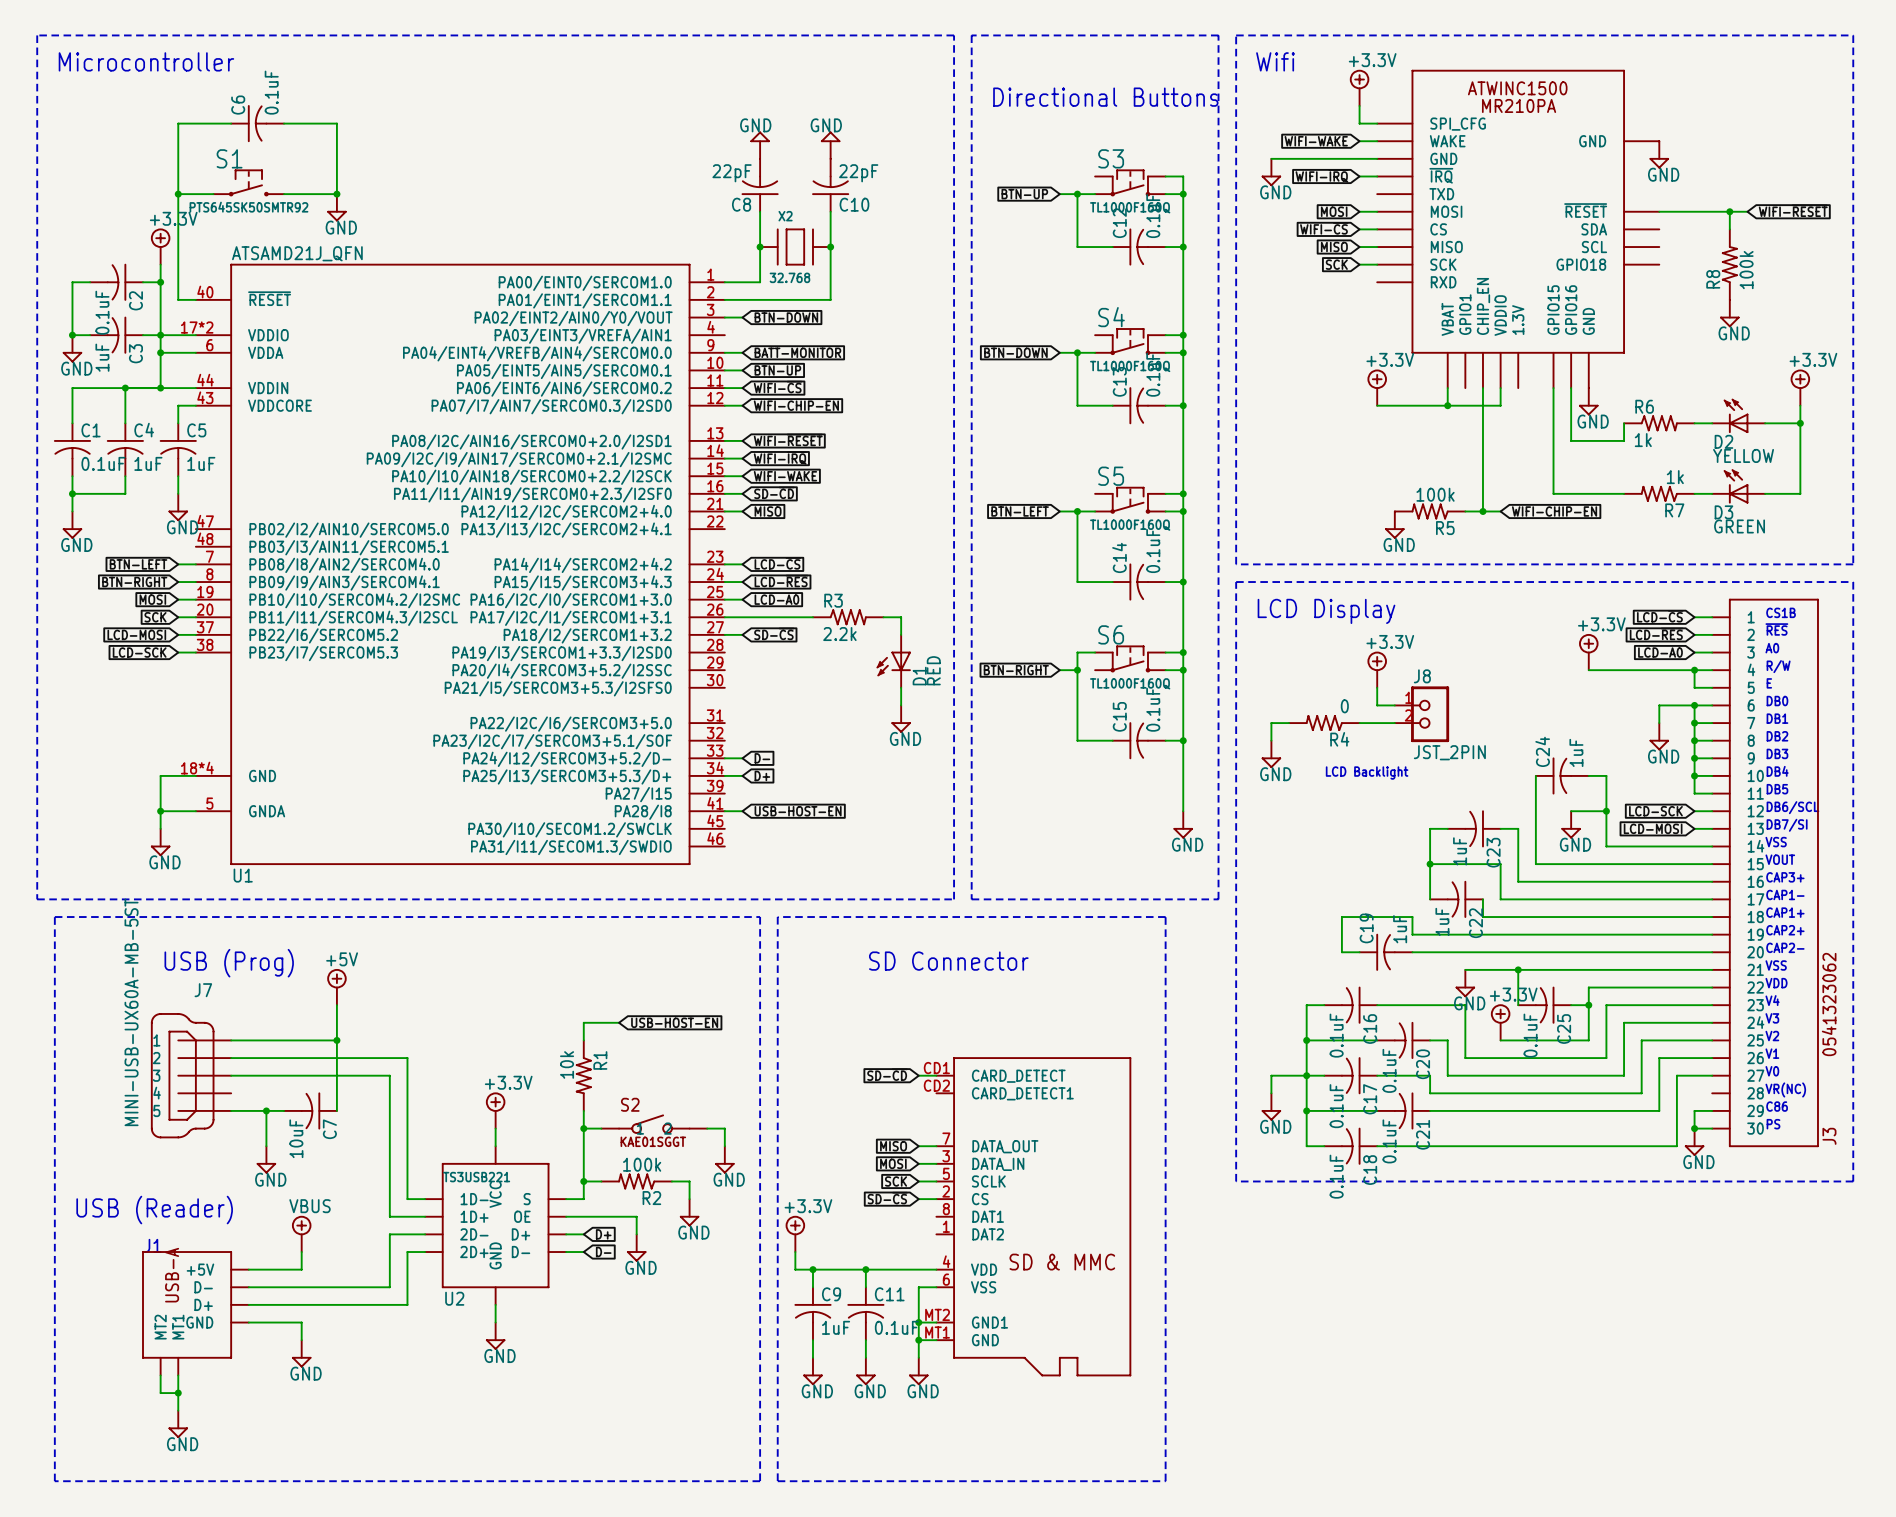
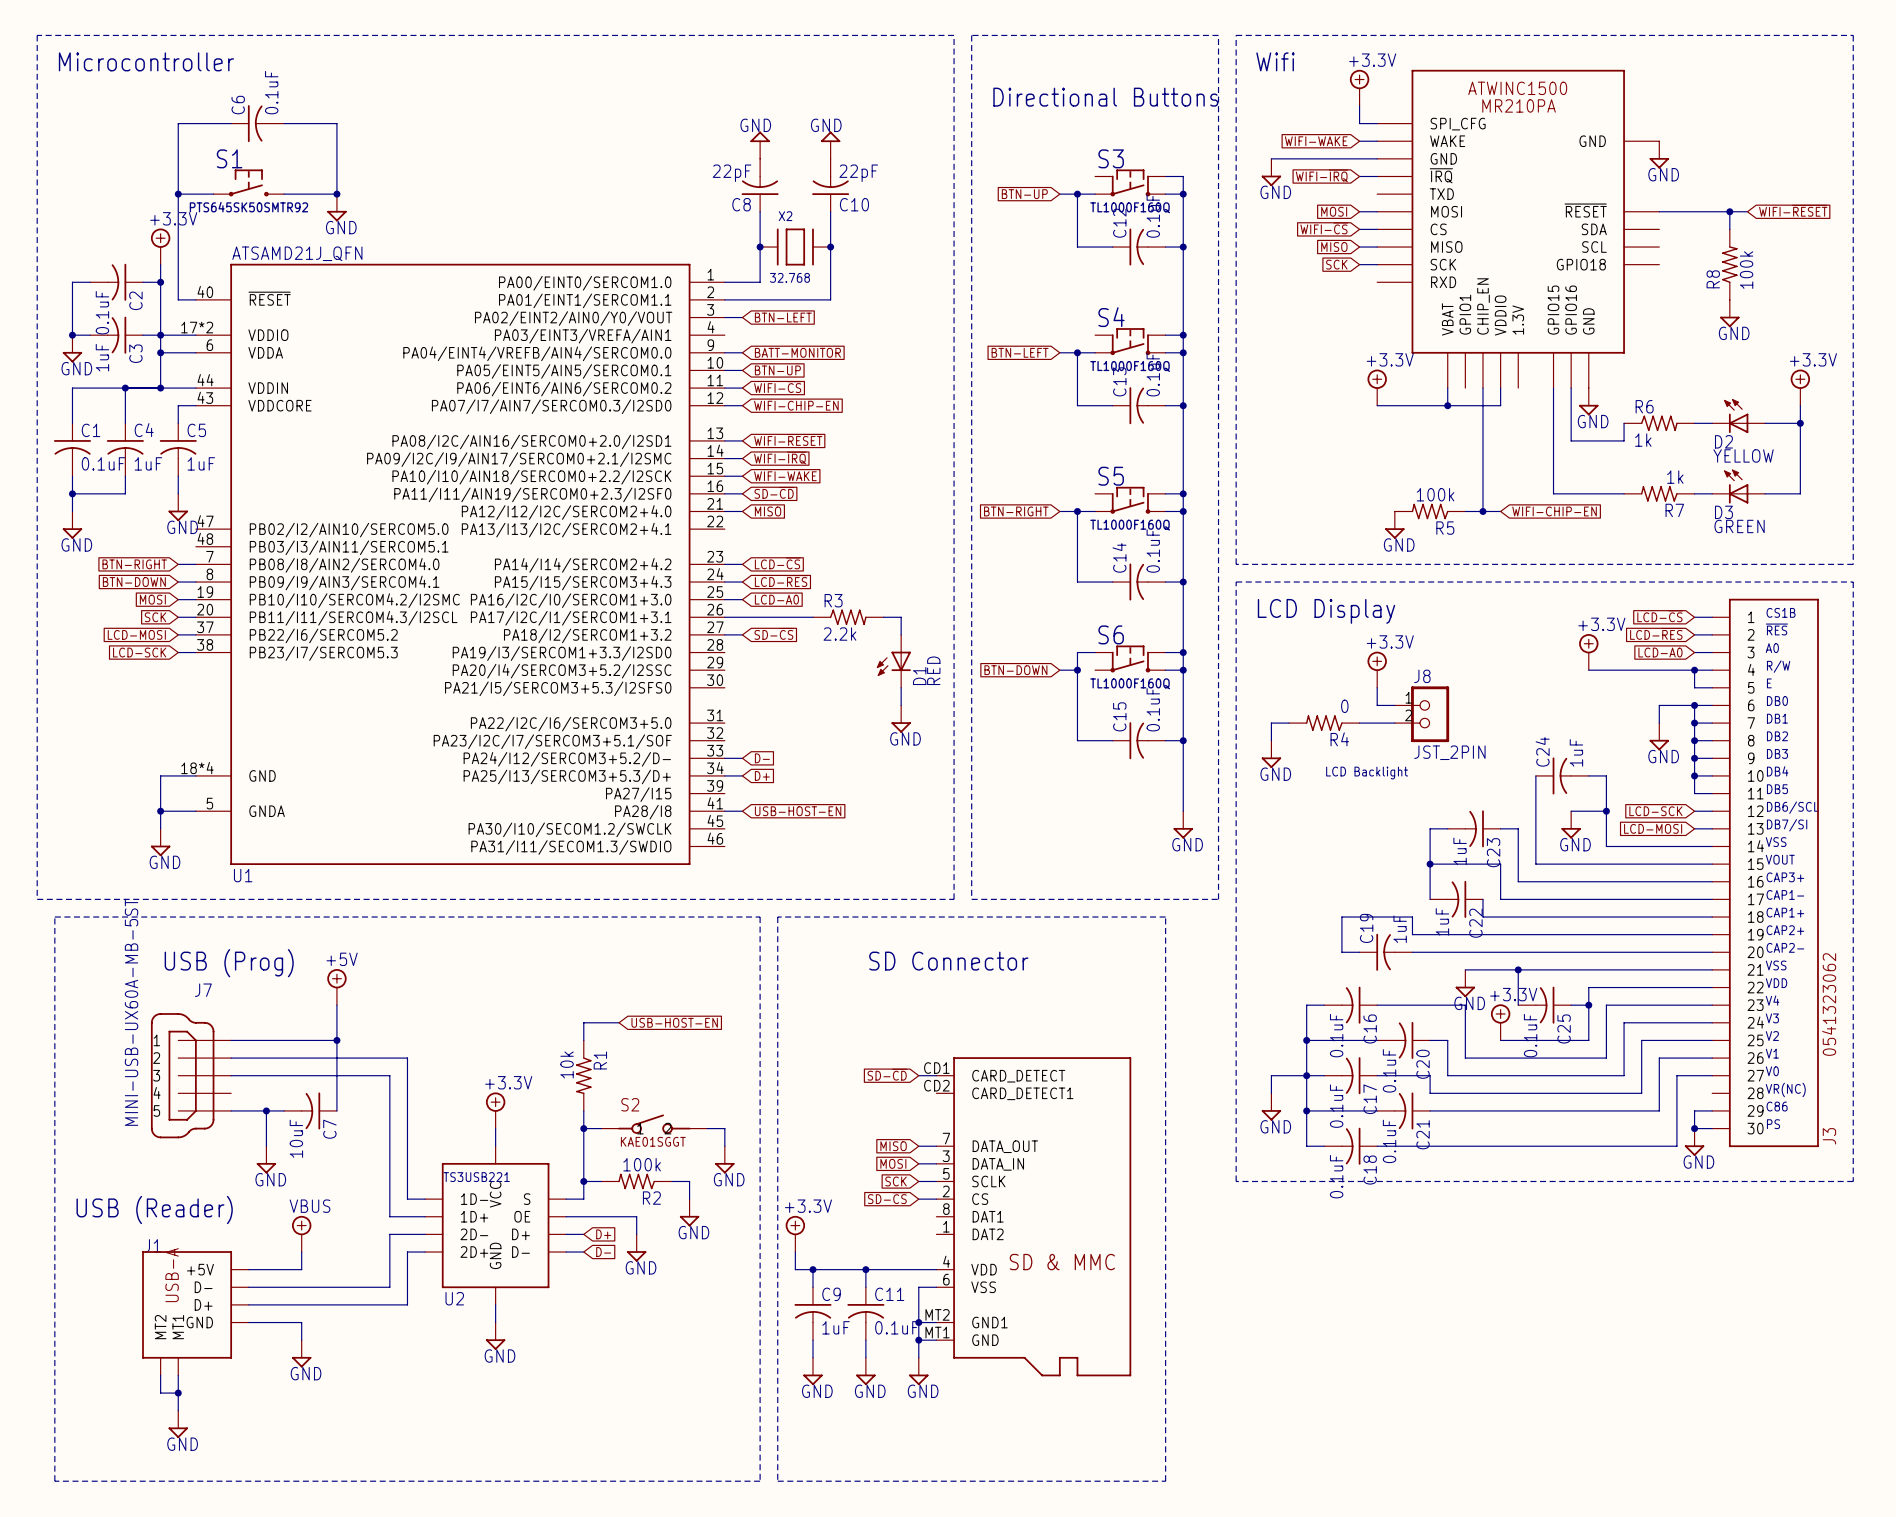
global label: BTN-DOWN (786, 317) -> BTN-LEFT (783, 317)
global label: BTN-DOWN (1015, 352) -> BTN-LEFT (1020, 352)
global label: BTN-LEFT (1020, 511) -> BTN-RIGHT (1016, 511)
global label: BTN-LEFT (138, 564) -> BTN-RIGHT (134, 564)
global label: BTN-RIGHT (134, 582) -> BTN-DOWN (134, 582)
global label: BTN-RIGHT (1016, 670) -> BTN-DOWN (1015, 670)

